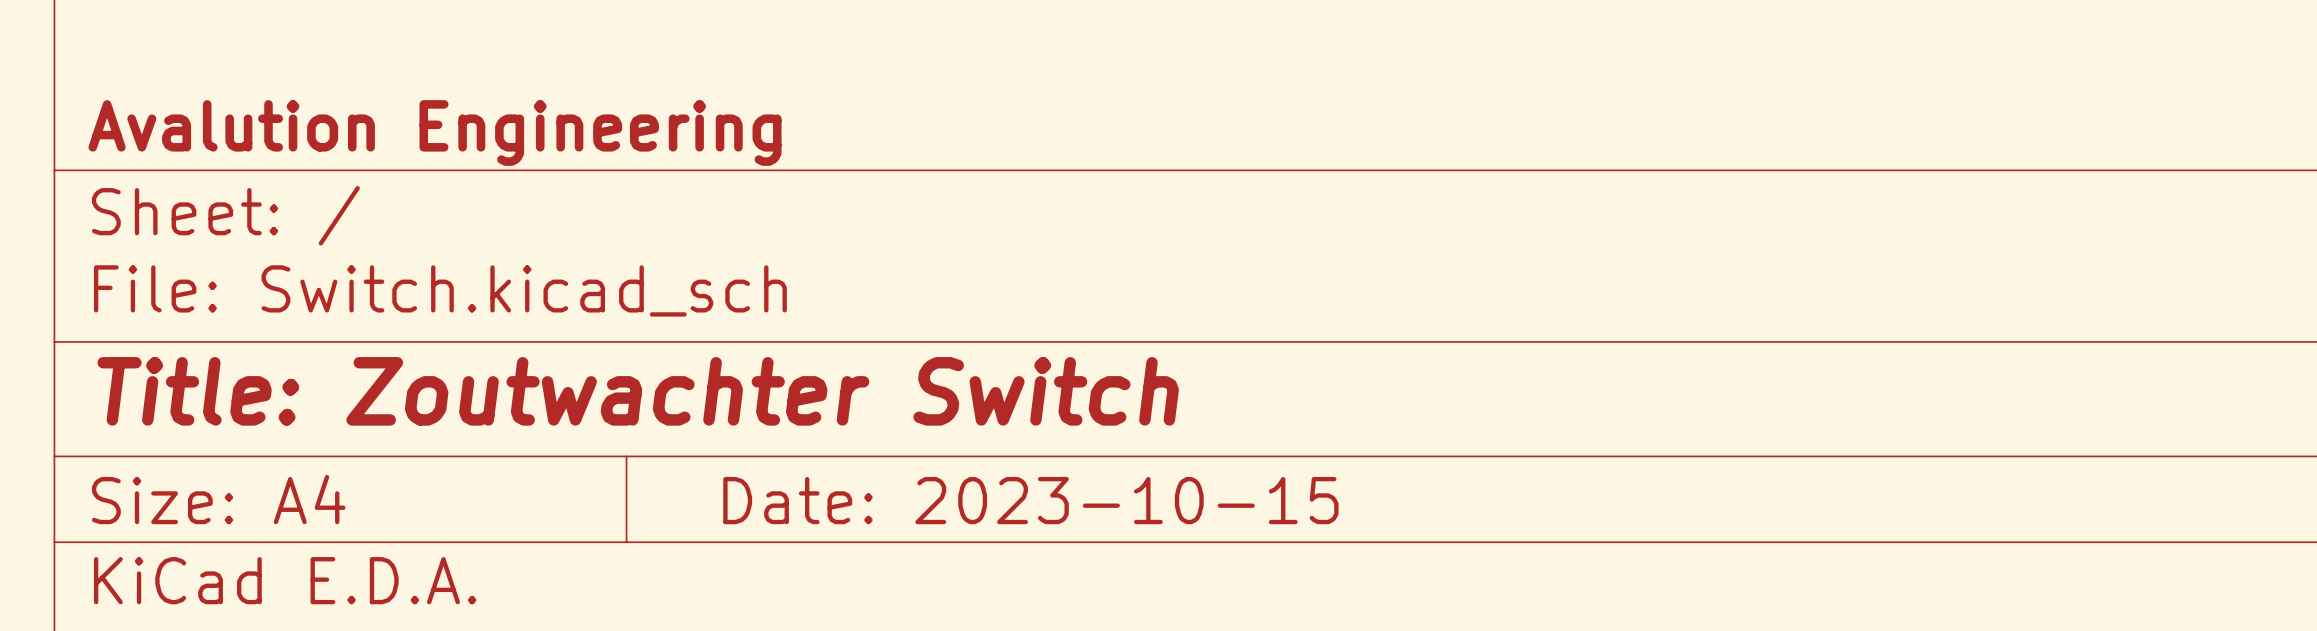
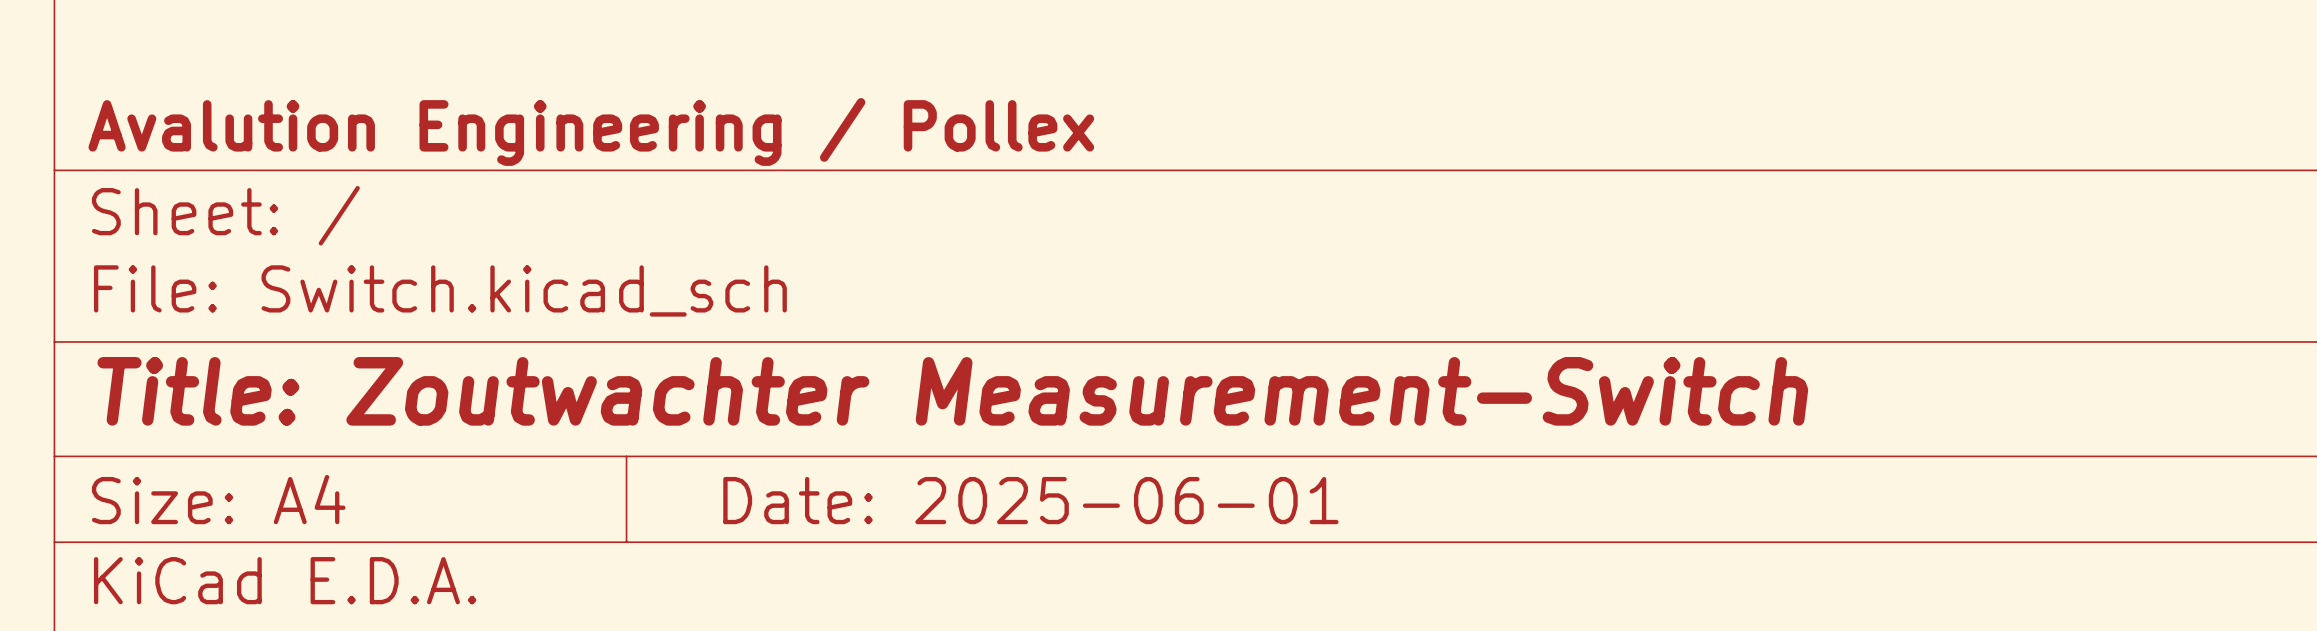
title block: Avalution Engineering (435, 133) -> Avalution Engineering / Pollex (591, 131)
title block: Title: Zoutwachter Switch (638, 391) -> Title: Zoutwachter Measurement-Switch (952, 391)
title block: Date: 2023-10-15 (1030, 500) -> Date: 2025-06-01 (1030, 500)

